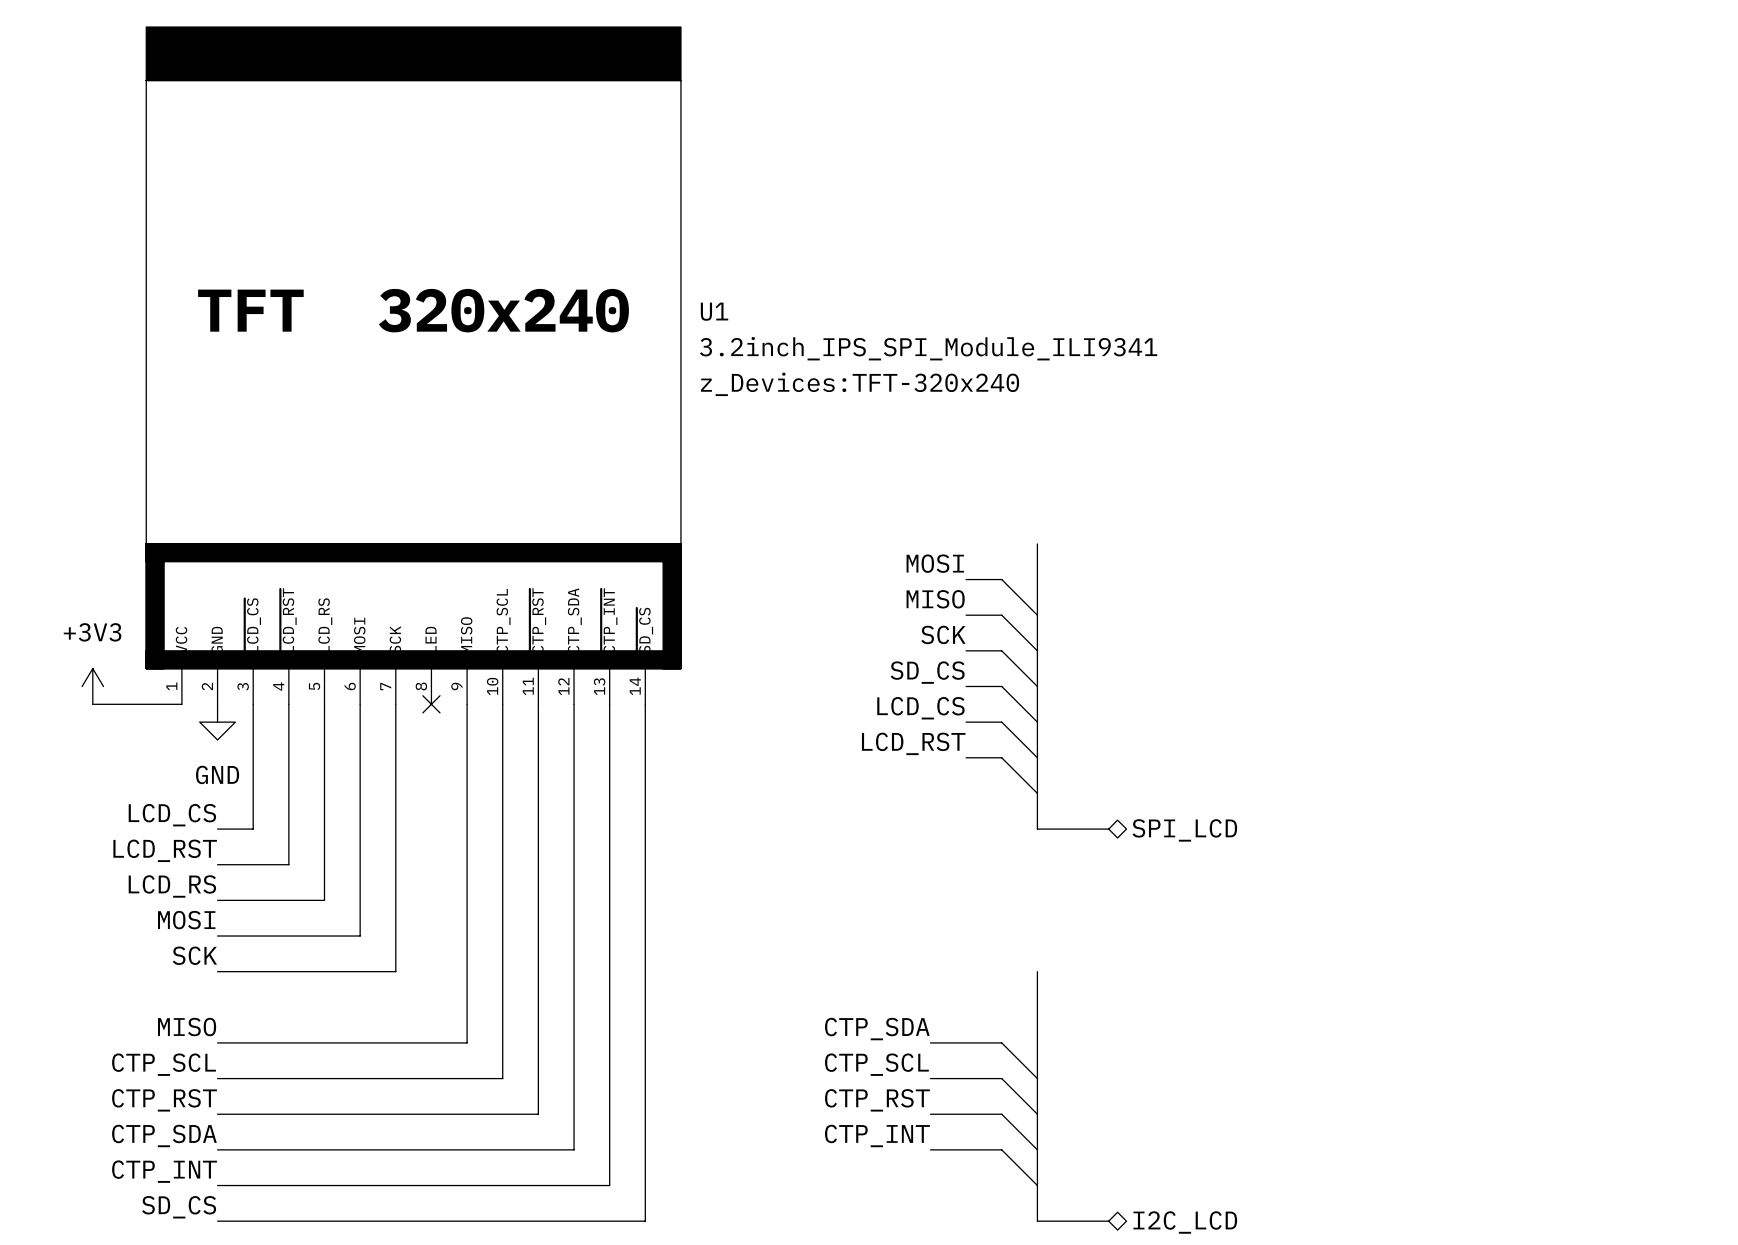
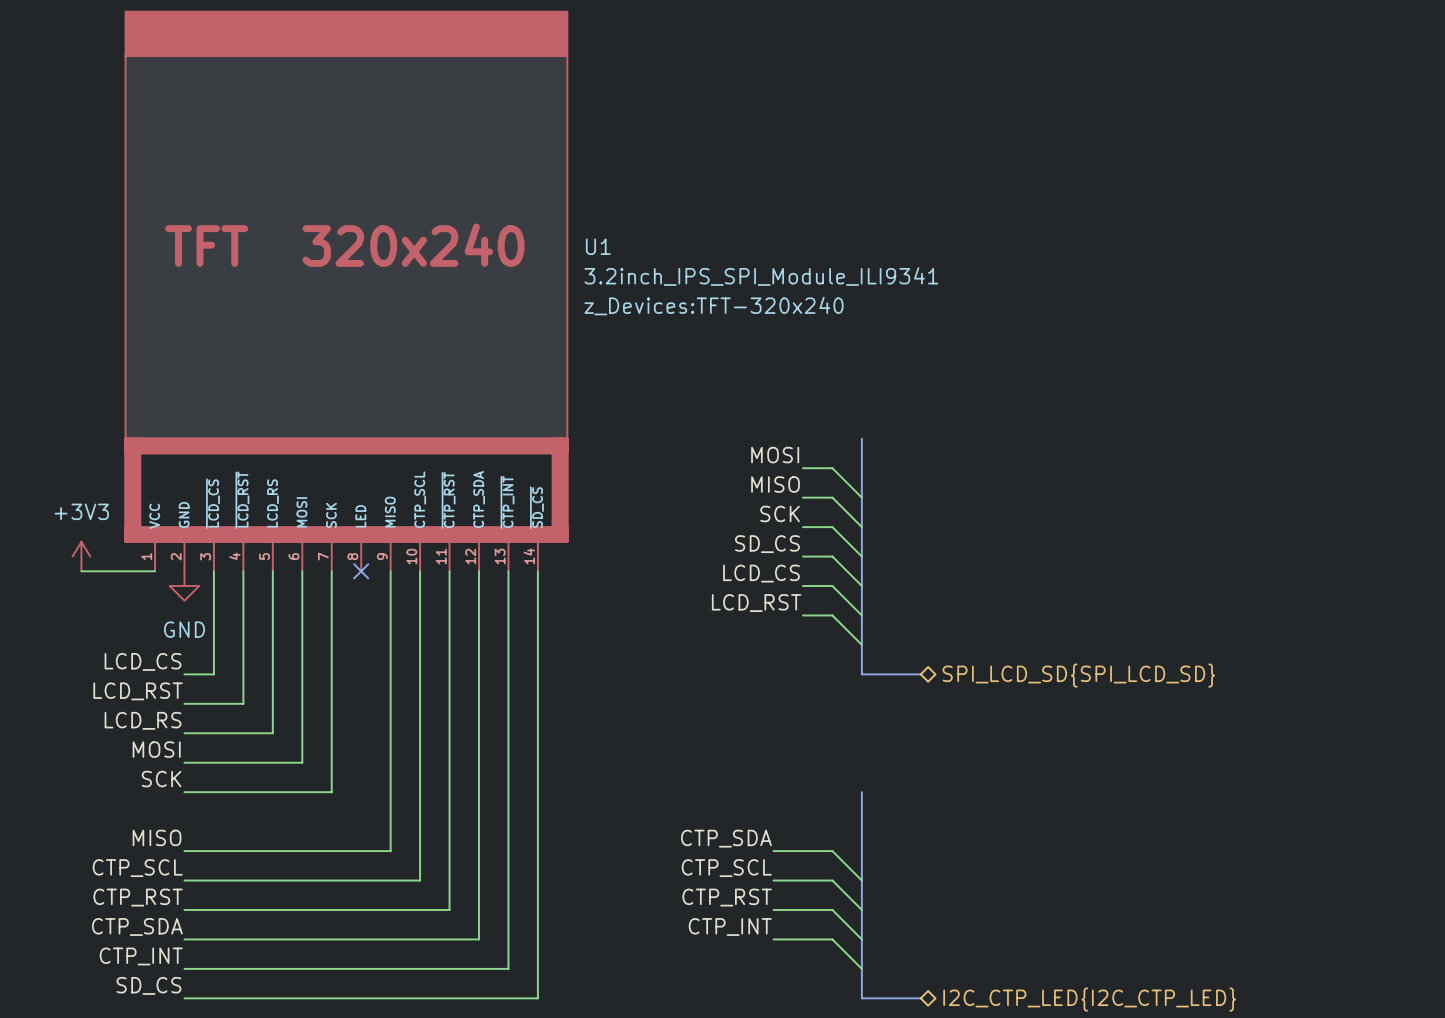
hierarchical label: SPI_LCD (1184, 830) -> SPI_LCD_SD{SPI_LCD_SD} (1078, 675)
hierarchical label: I2C_LCD (1185, 1222) -> I2C_CTP_LED{I2C_CTP_LED} (1089, 999)

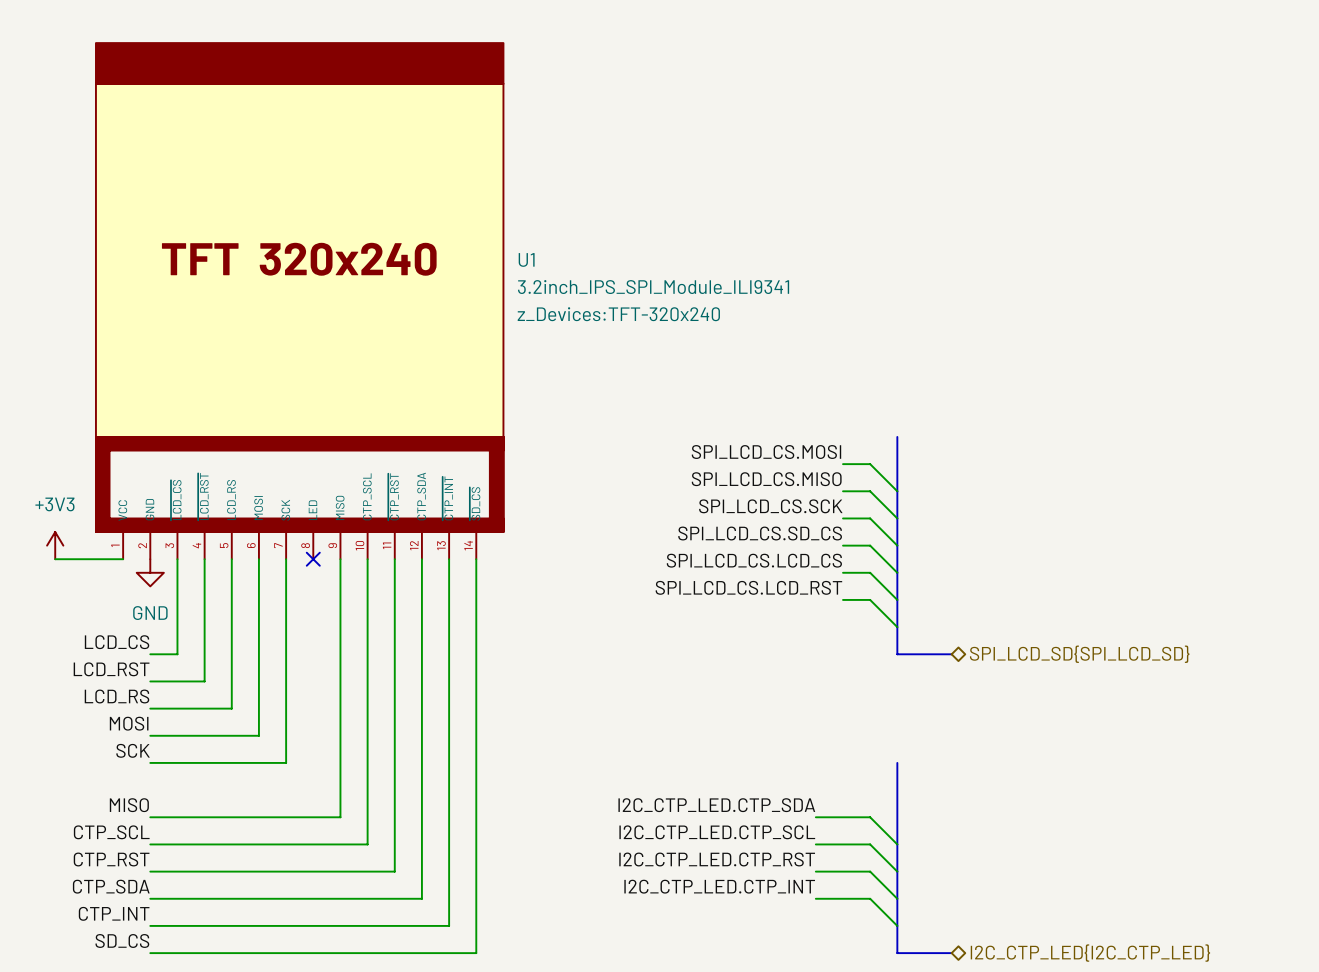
bus: (861, 438) (861, 674) (920, 674) -> (897, 436) (897, 654) (951, 654)
label: MOSI (775, 455) -> none
label: none -> SPI_LCD_CS.MOSI (766, 452)
wire: (802, 468) (832, 468) (861, 497) -> (843, 464) (870, 464) (897, 491)
label: MISO (775, 484) -> none
label: none -> SPI_LCD_CS.MISO (766, 479)
wire: (802, 497) (832, 497) (861, 527) -> (843, 491) (870, 491) (897, 518)
label: SCK (780, 513) -> none
label: none -> SPI_LCD_CS.SCK (770, 506)
wire: (802, 527) (832, 527) (861, 556) -> (843, 518) (870, 518) (897, 545)
label: SD_CS (767, 544) -> none
label: none -> SPI_LCD_CS.SD_CS (760, 533)
wire: (802, 556) (832, 556) (861, 586) -> (843, 545) (870, 545) (897, 572)
label: LCD_CS (761, 573) -> none
label: none -> SPI_LCD_CS.LCD_CS (754, 560)
wire: (802, 586) (832, 586) (861, 615) -> (843, 572) (870, 572) (897, 599)
label: LCD_RST (756, 603) -> none
label: none -> SPI_LCD_CS.LCD_RST (748, 587)
wire: (802, 615) (832, 615) (861, 644) -> (843, 599) (870, 599) (897, 627)
hierarchical label position: SPI_LCD_SD{SPI_LCD_SD} (1078, 675) -> SPI_LCD_SD{SPI_LCD_SD} (1079, 654)
bus: (861, 792) (861, 998) (920, 998) -> (897, 762) (897, 953) (951, 953)
label: CTP_SDA (726, 838) -> none
label: none -> I2C_CTP_LED.CTP_SDA (716, 805)
wire: (773, 851) (832, 851) (861, 880) -> (815, 817) (870, 817) (897, 844)
label: CTP_SCL (726, 868) -> none
label: none -> I2C_CTP_LED.CTP_SCL (717, 832)
wire: (773, 880) (832, 880) (861, 909) -> (815, 844) (870, 844) (897, 871)
label: CTP_RST (727, 897) -> none
label: none -> I2C_CTP_LED.CTP_RST (717, 859)
wire: (773, 909) (832, 909) (861, 939) -> (815, 871) (870, 871) (897, 898)
label: CTP_INT (730, 927) -> none
label: none -> I2C_CTP_LED.CTP_INT (719, 886)
wire: (773, 939) (832, 939) (861, 968) -> (815, 898) (870, 898) (897, 925)
hierarchical label position: I2C_CTP_LED{I2C_CTP_LED} (1089, 999) -> I2C_CTP_LED{I2C_CTP_LED} (1090, 953)

